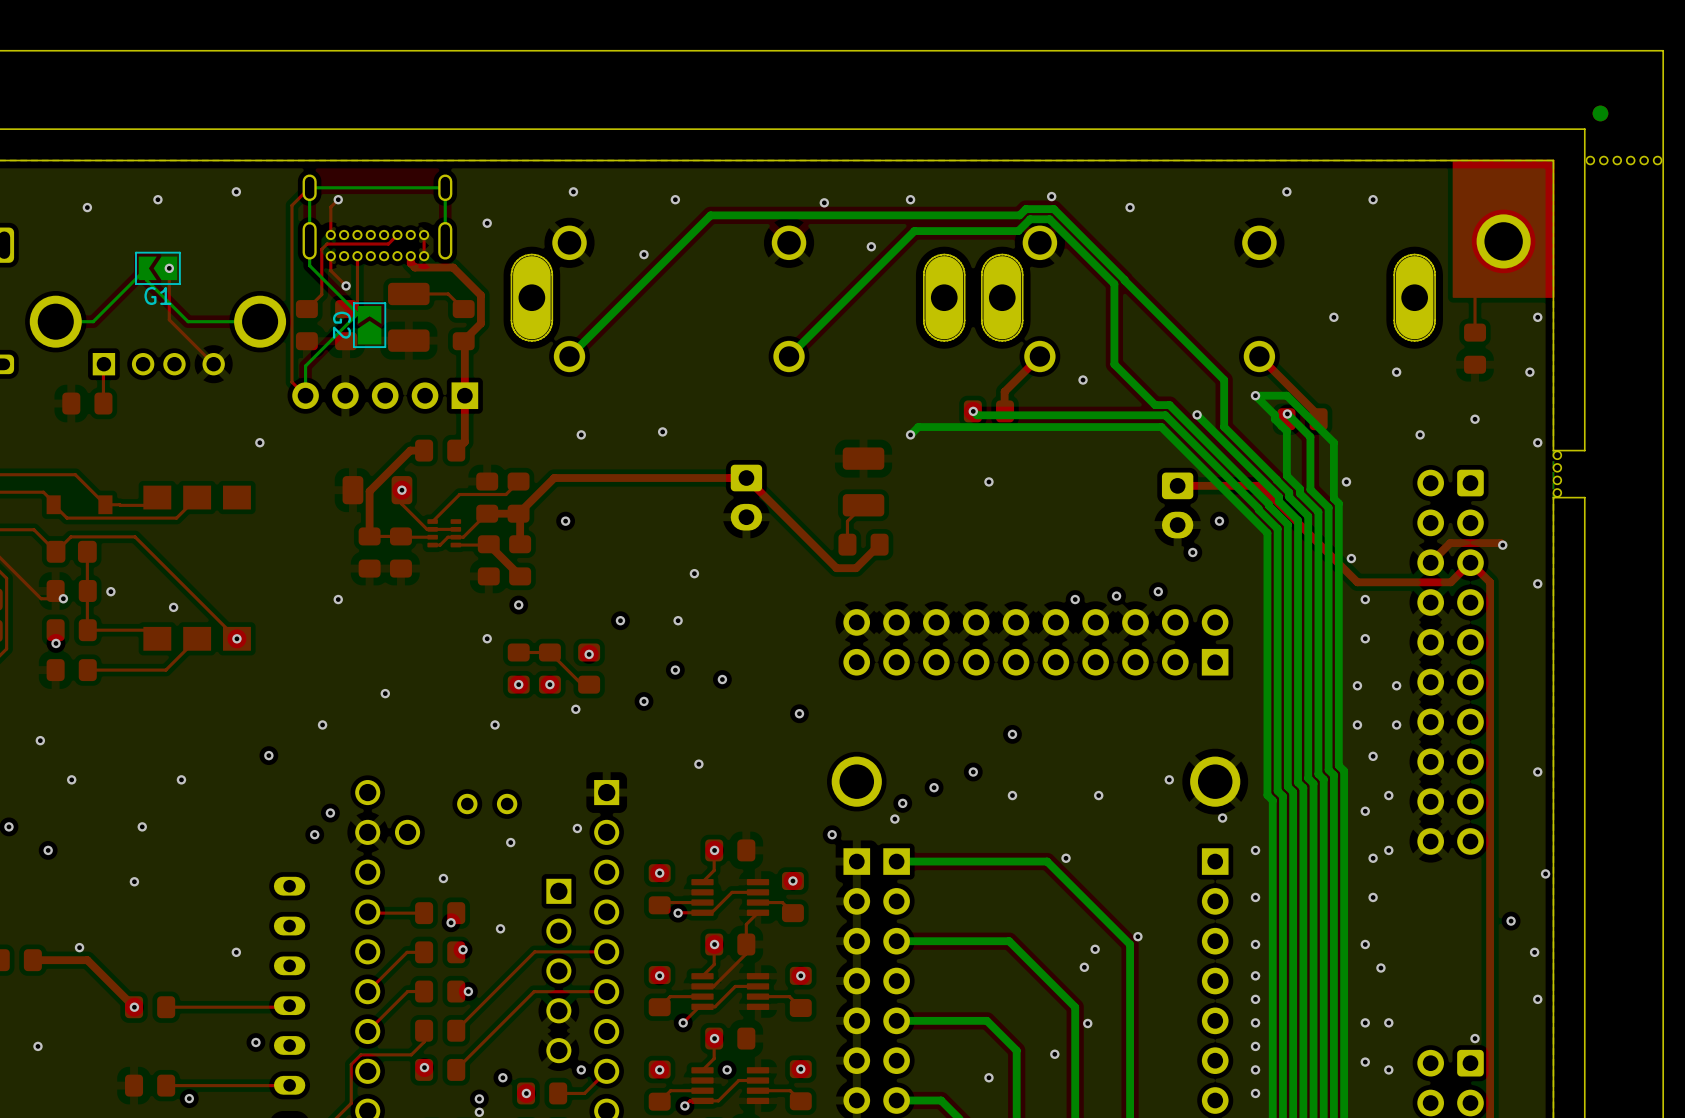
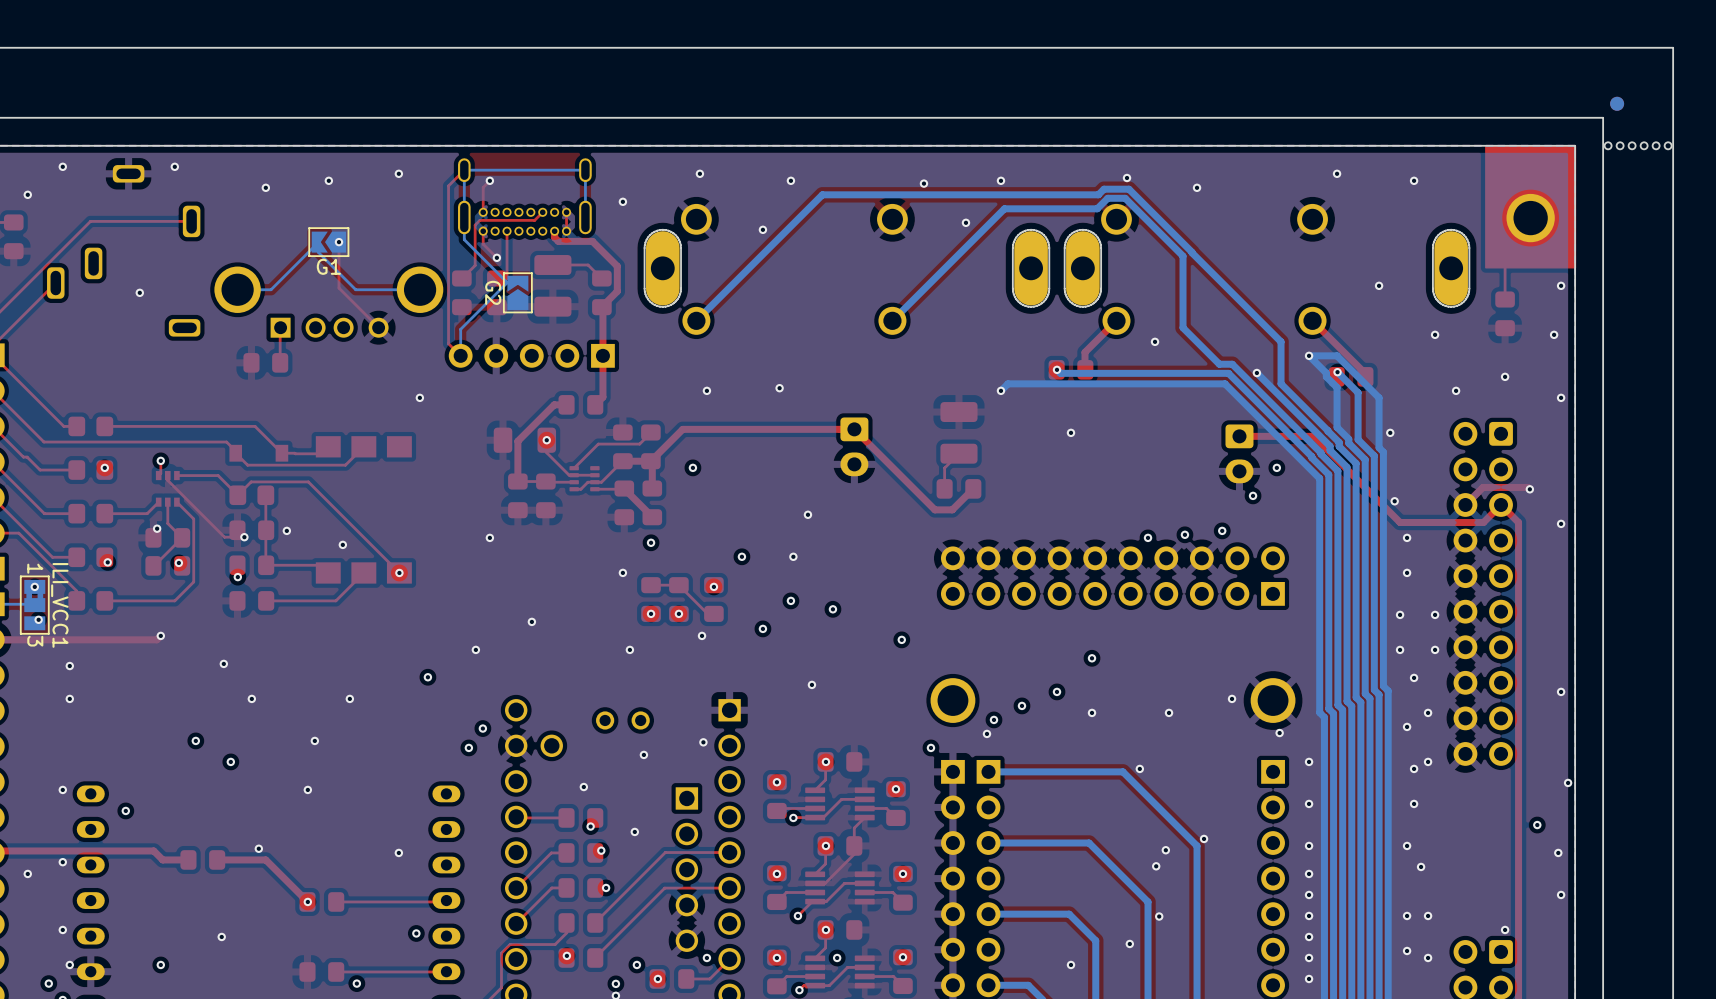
board edge: (1584, 450) (1553, 450) -> (1603, 404) (1603, 446)
part: (1557, 455) -> none
part: (1557, 467) -> none
part: (1557, 480) -> none
part: (1557, 492) -> none
board edge: (1584, 497) (1553, 497) -> (1575, 404) (1575, 446)

